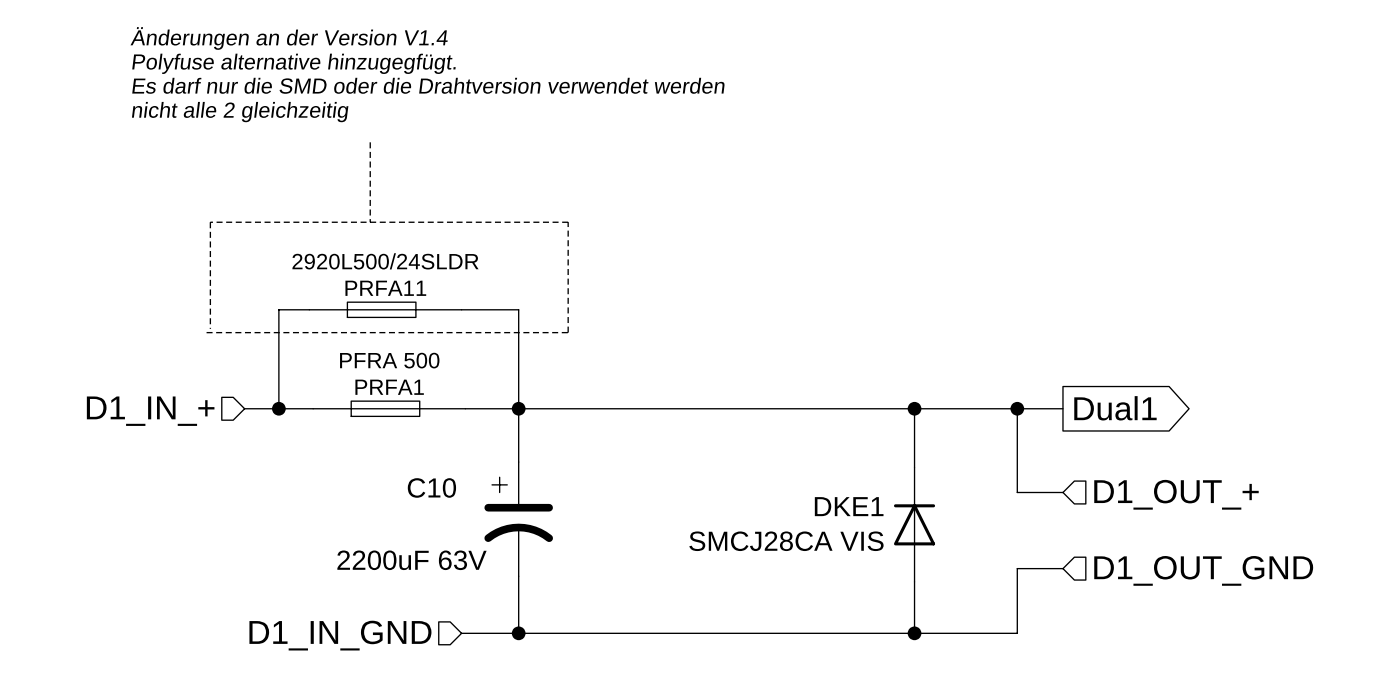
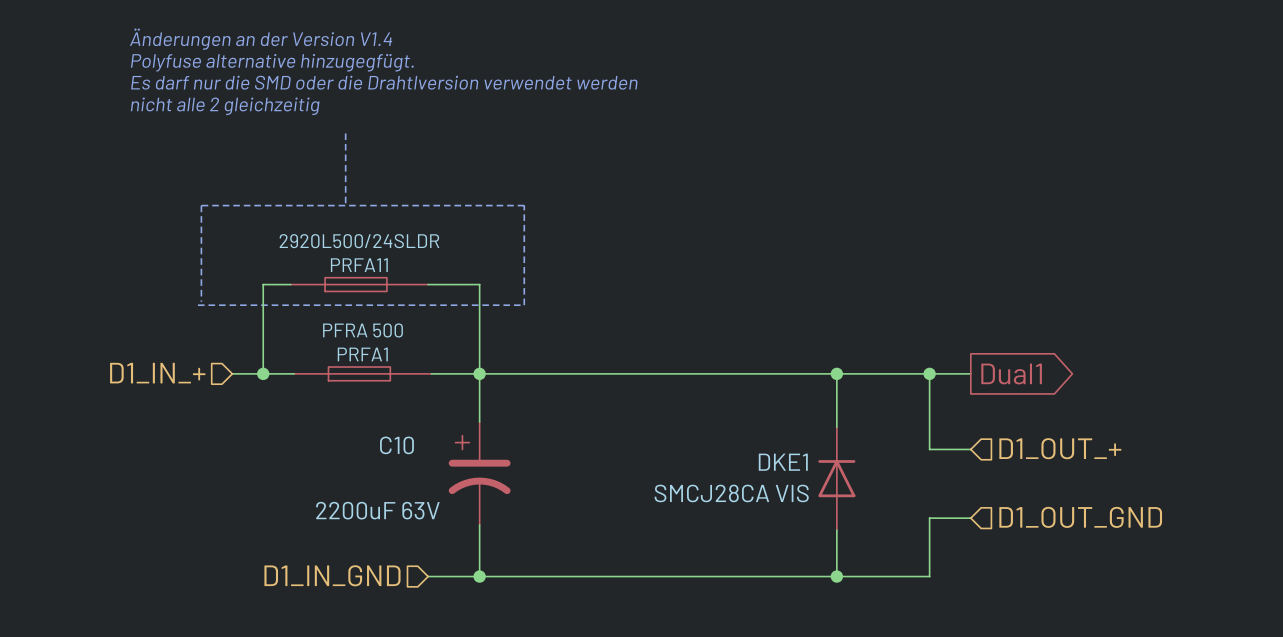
text: Es darf nur die SMD oder die Drahtversion verwendet werden (428, 85) -> Es darf nur die SMD oder die Drahtlversion verwendet werden (384, 82)

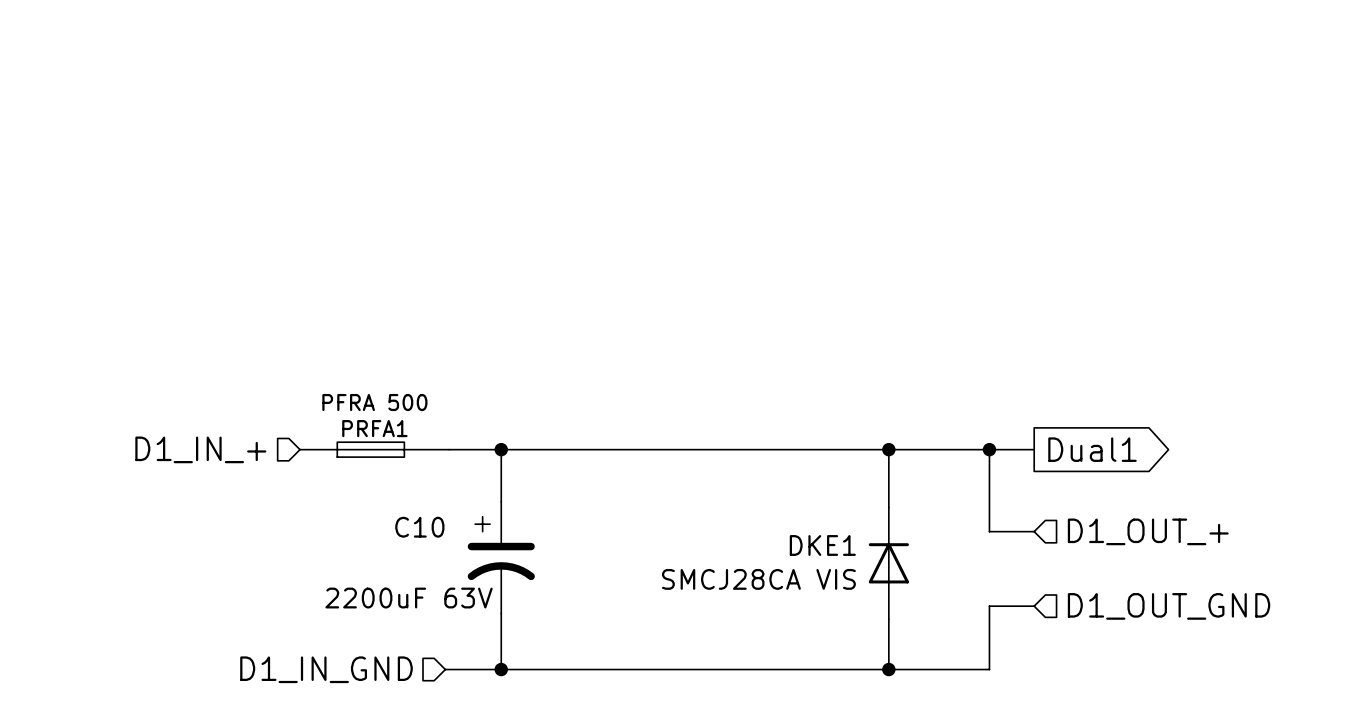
text: Änderungen an der Version V1.4 (261, 39) -> none
text: Polyfuse alternative hinzugegfügt. (272, 62) -> none
text: Es darf nur die SMD oder die Drahtlversion verwendet werden (384, 82) -> none
text: nicht alle 2 gleichzeitig (225, 106) -> none
line: (345, 133) (345, 205) -> none
wire: (290, 284) (263, 284) (263, 373) -> none
PRFA11: 2920L500/24SLDR (359, 284) -> none
wire: (428, 284) (479, 284) (479, 373) -> none
line: (201, 301) (201, 205) (524, 205) (524, 305) (197, 305) -> none
hierarchical label position: D1_IN_+ (157, 373) -> D1_IN_+ (200, 449)
wire: (232, 373) (294, 373) -> none
junction: (263, 373) -> none

